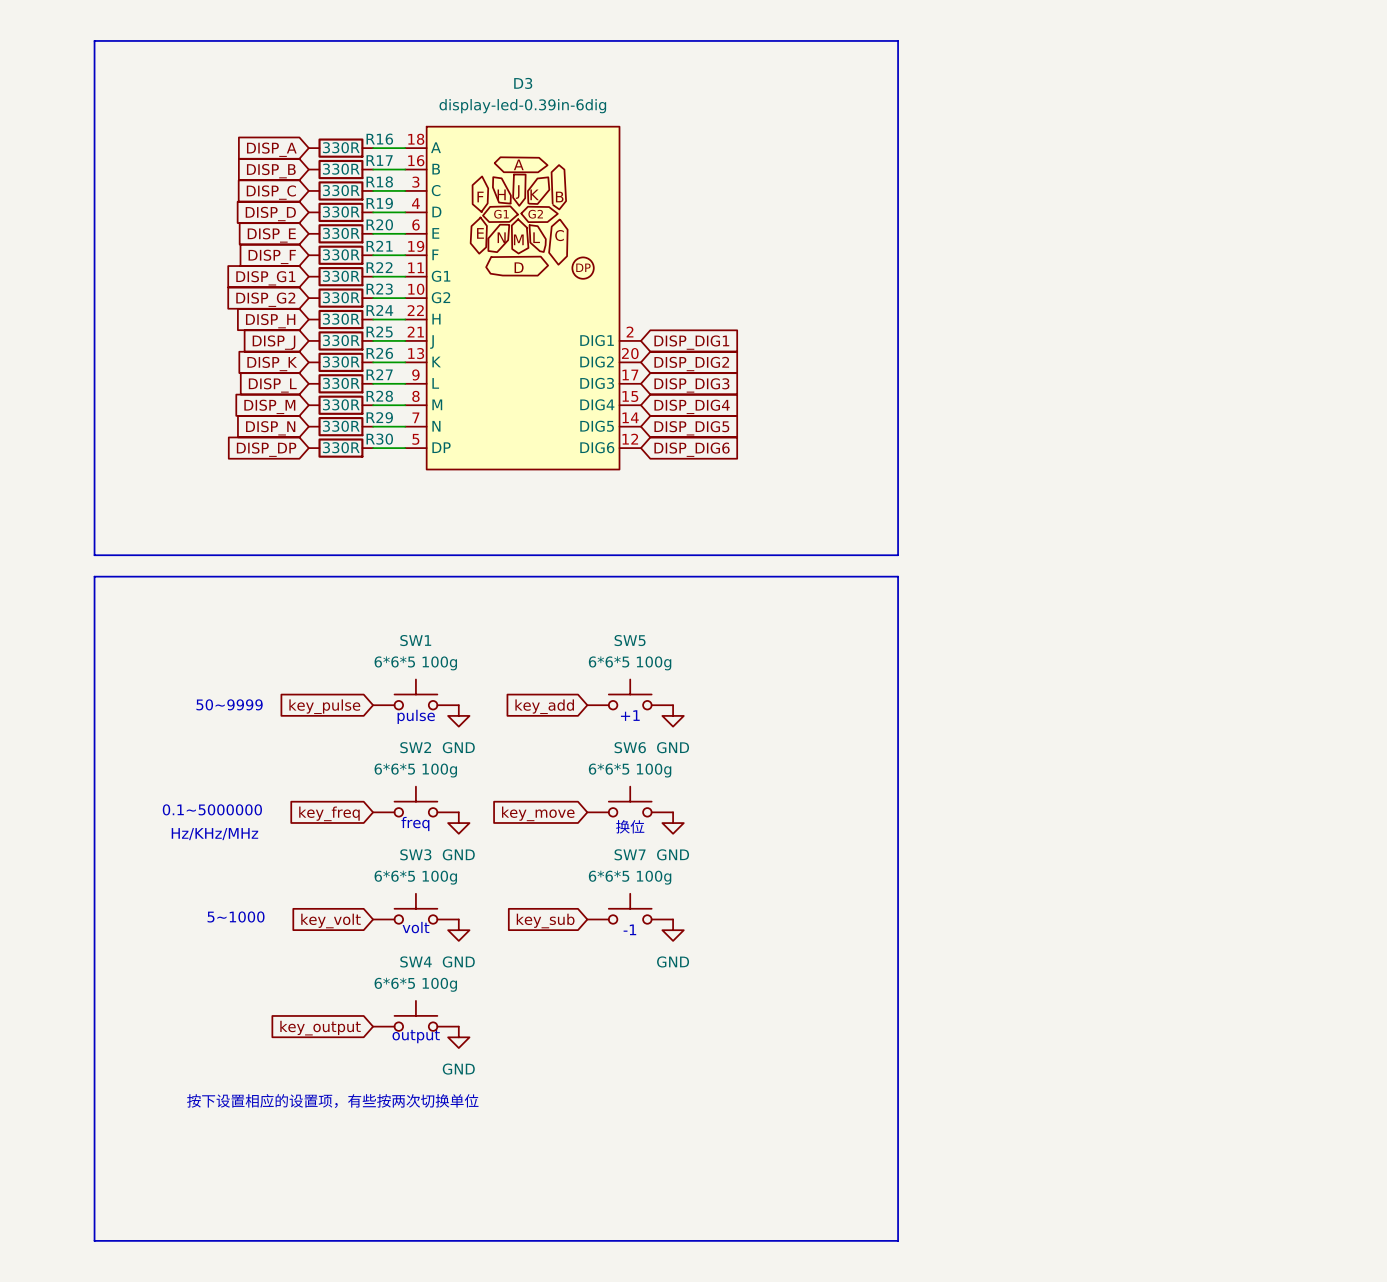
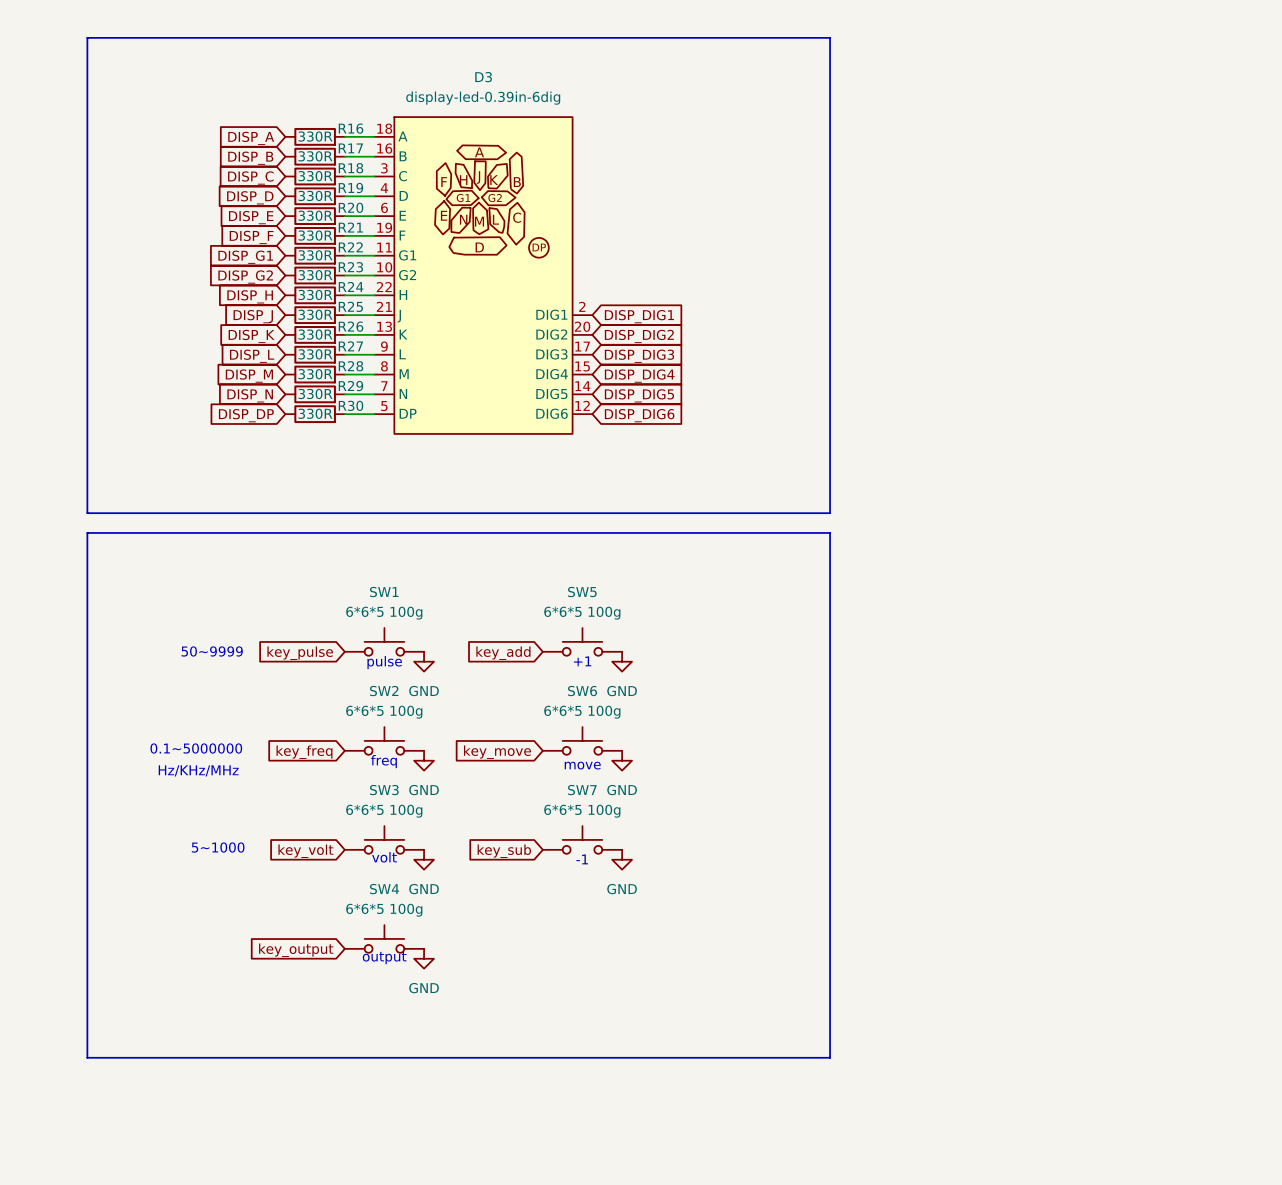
text: 换位 (630, 826) -> move (582, 765)
text: 按下设置相应的设置项，有些按两次切换单位 (332, 1101) -> none
line: (94, 1144) (94, 1240) (898, 1240) (898, 1144) -> (87, 1057) (830, 1057)

